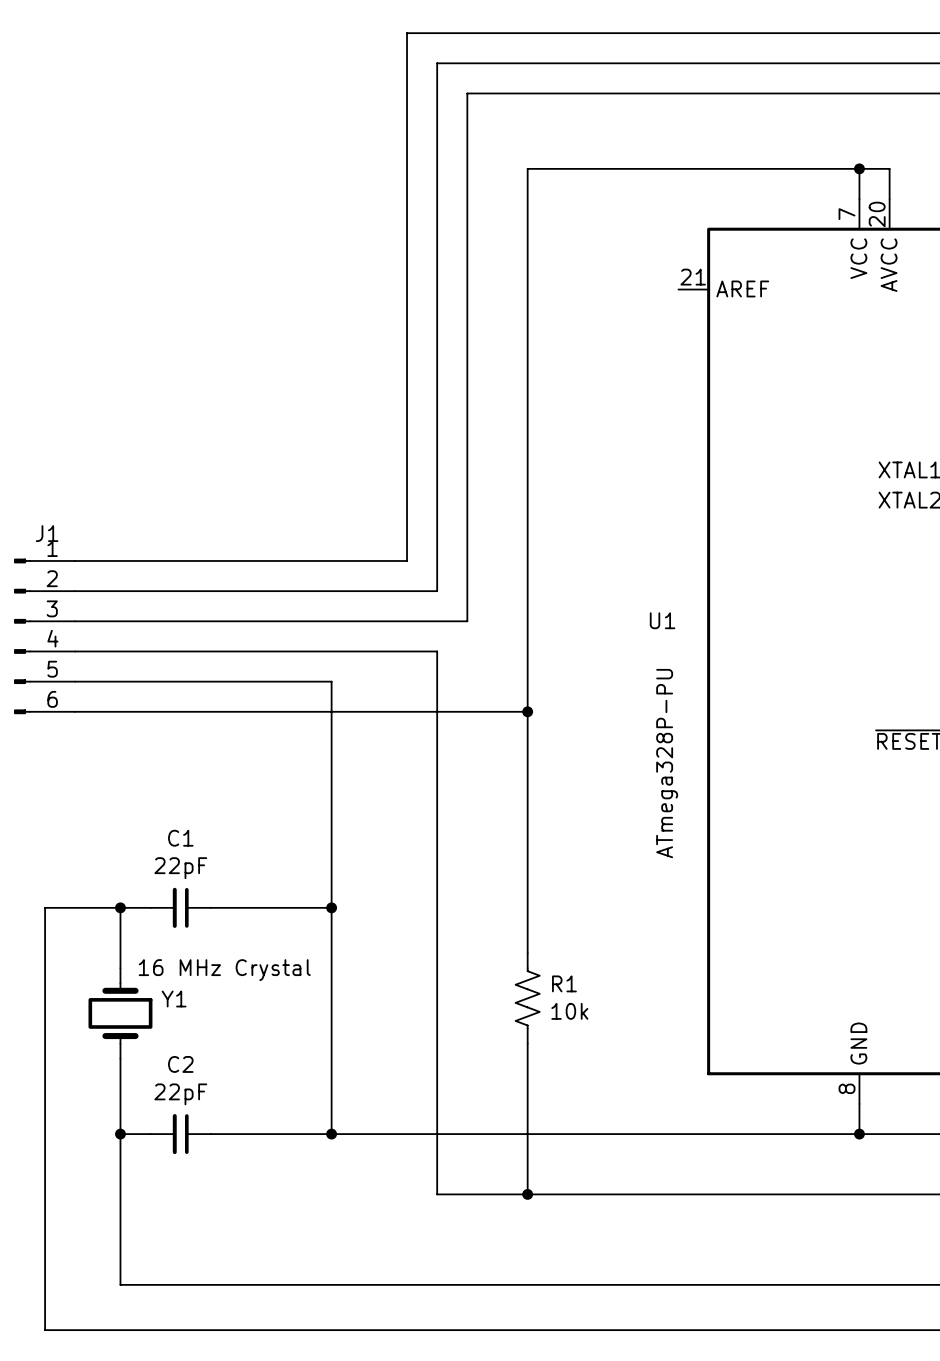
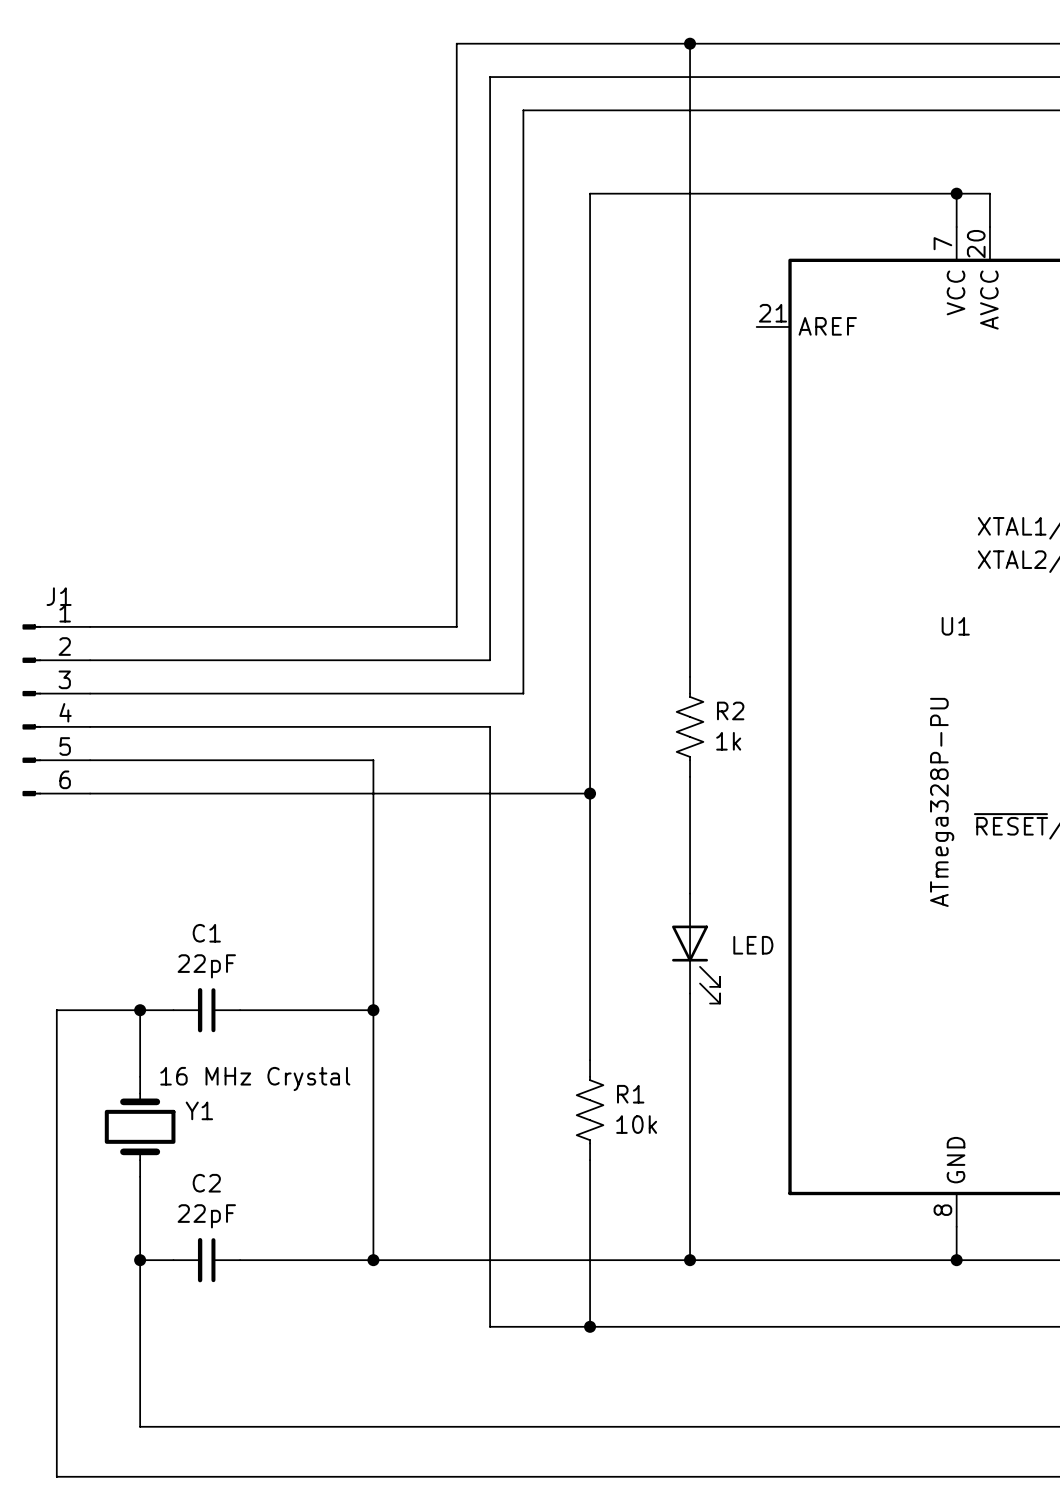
wire: none -> (690, 43) (690, 676)
junction: none -> (690, 43)
U1 name position: U1 (662, 620) -> U1 (955, 626)
R2: none -> 1k (690, 726)
wire: none -> (690, 776) (690, 893)
U1 value position: ATmega328P-PU (667, 763) -> ATmega328P-PU (942, 802)
part: none -> LED (696, 948)
wire: none -> (690, 993) (690, 1260)
junction: none -> (690, 1260)

